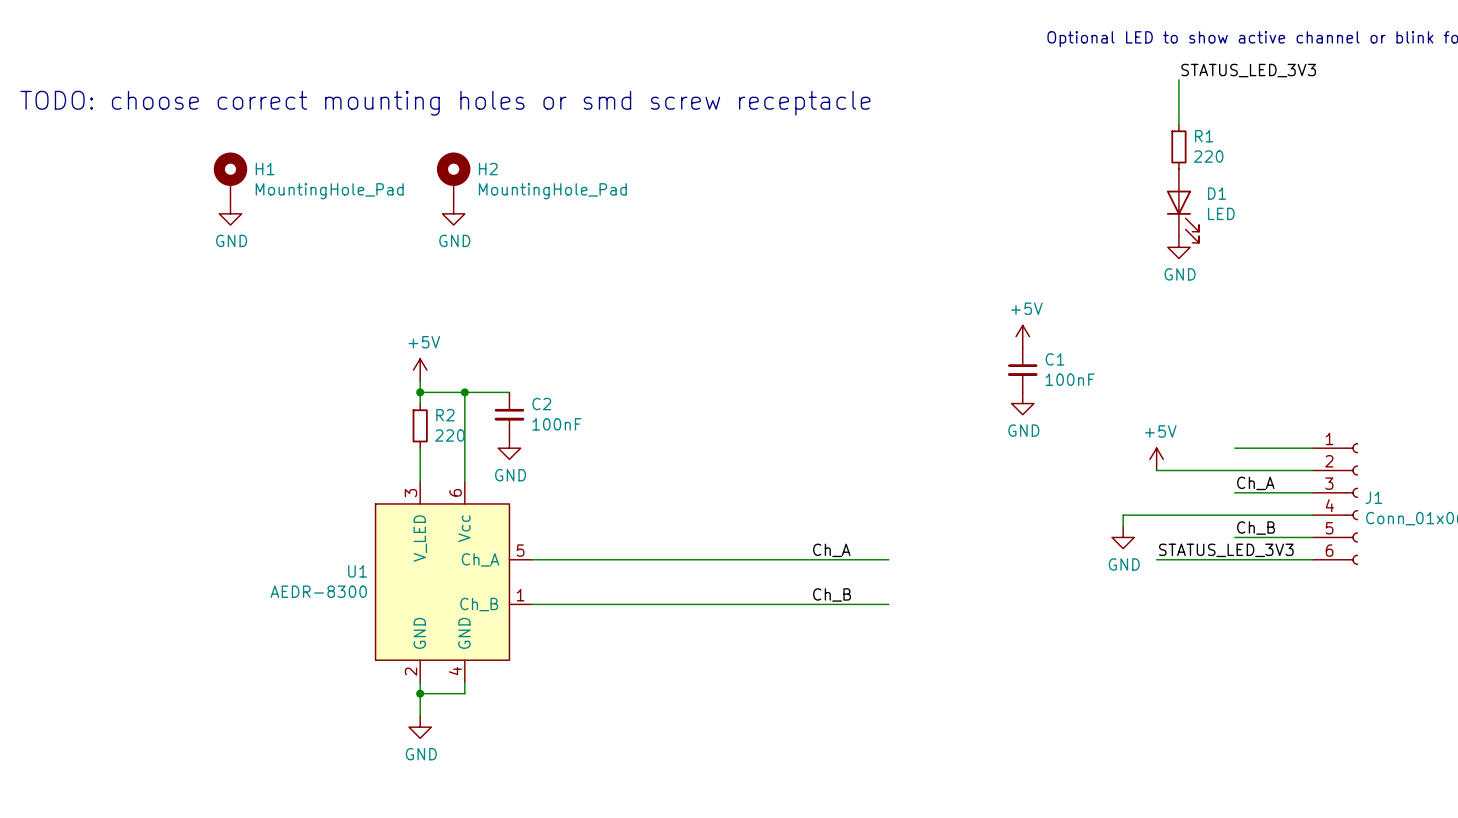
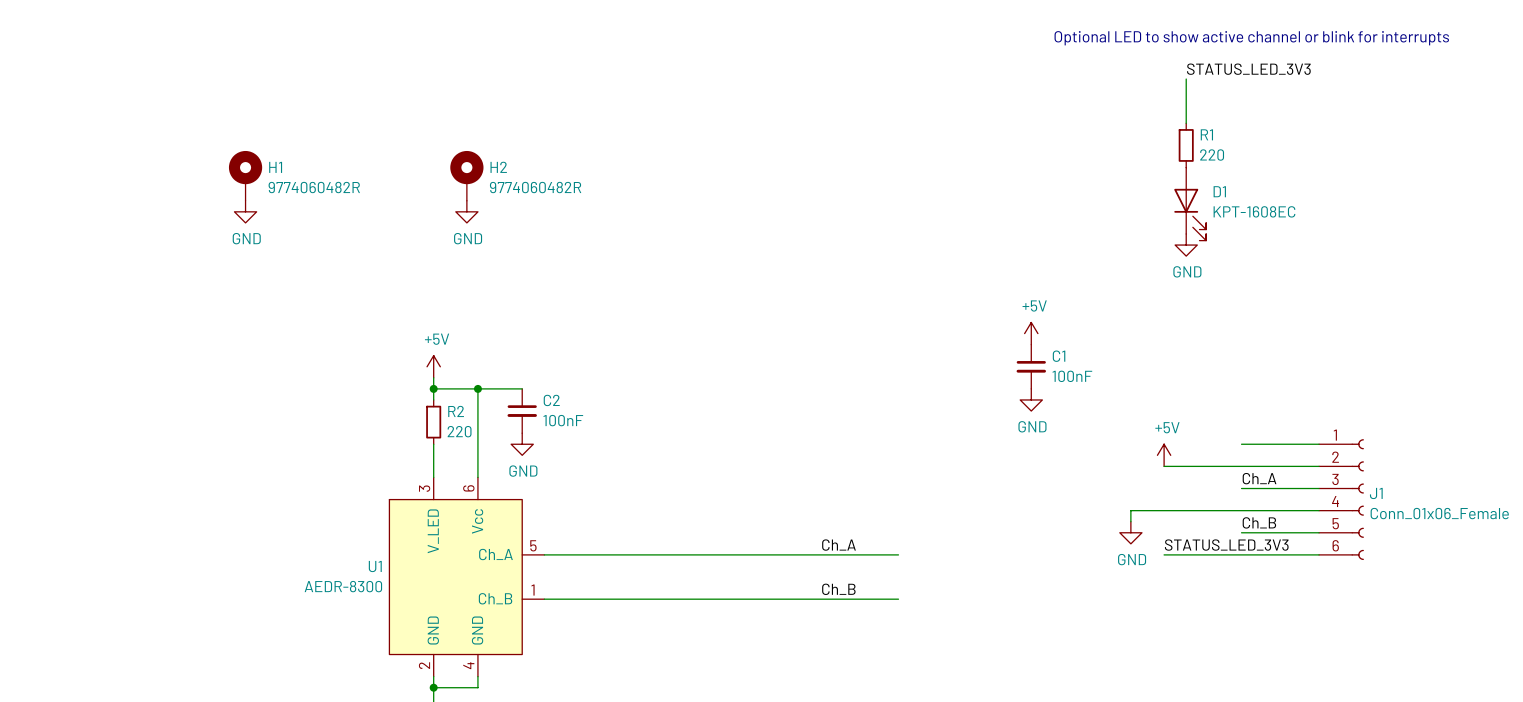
text: TODO: choose correct mounting holes or smd screw receptacle (445, 103) -> none
H1 value: MountingHole_Pad (329, 191) -> 9774060482R (314, 187)
H2 value: MountingHole_Pad (552, 191) -> 9774060482R (535, 187)
D1 value: LED (1221, 213) -> KPT-1608EC (1254, 211)

